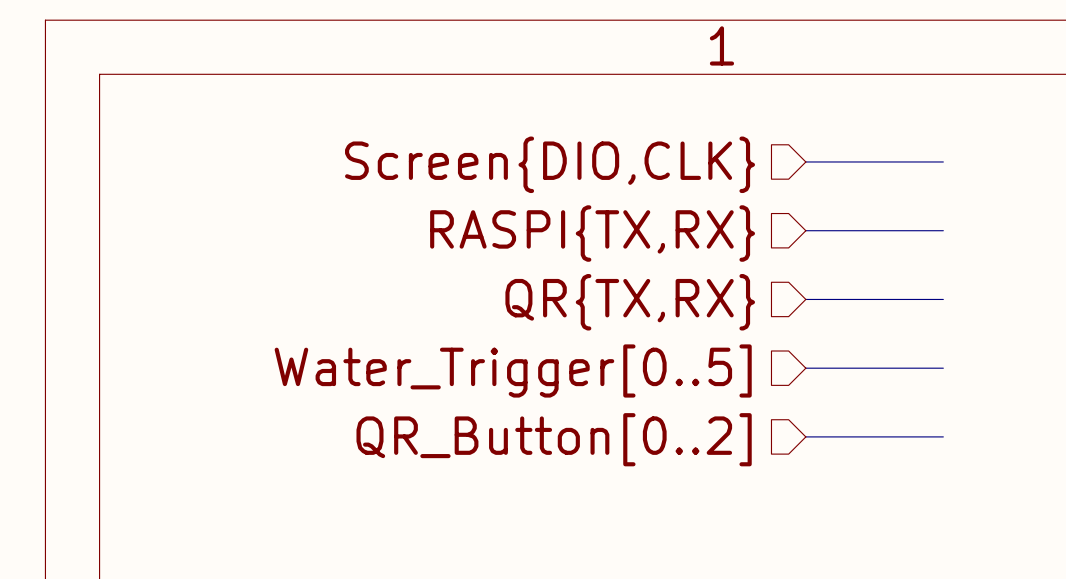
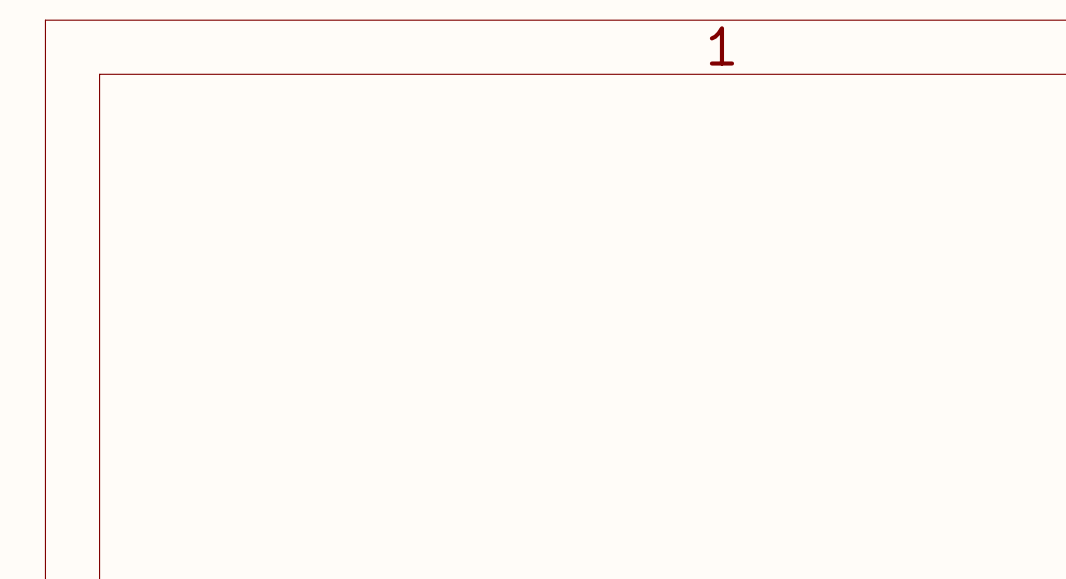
bus: (805, 161) (943, 161) -> none
hierarchical label: Screen{DIO,CLK} (550, 164) -> none
bus: (805, 230) (943, 230) -> none
hierarchical label: RASPI{TX,RX} (592, 233) -> none
bus: (805, 299) (943, 299) -> none
hierarchical label: QR{TX,RX} (630, 302) -> none
bus: (805, 368) (943, 368) -> none
hierarchical label: Water_Trigger[0..5] (513, 370) -> none
bus: (805, 436) (943, 436) -> none
hierarchical label: QR_Button[0..2] (554, 439) -> none

